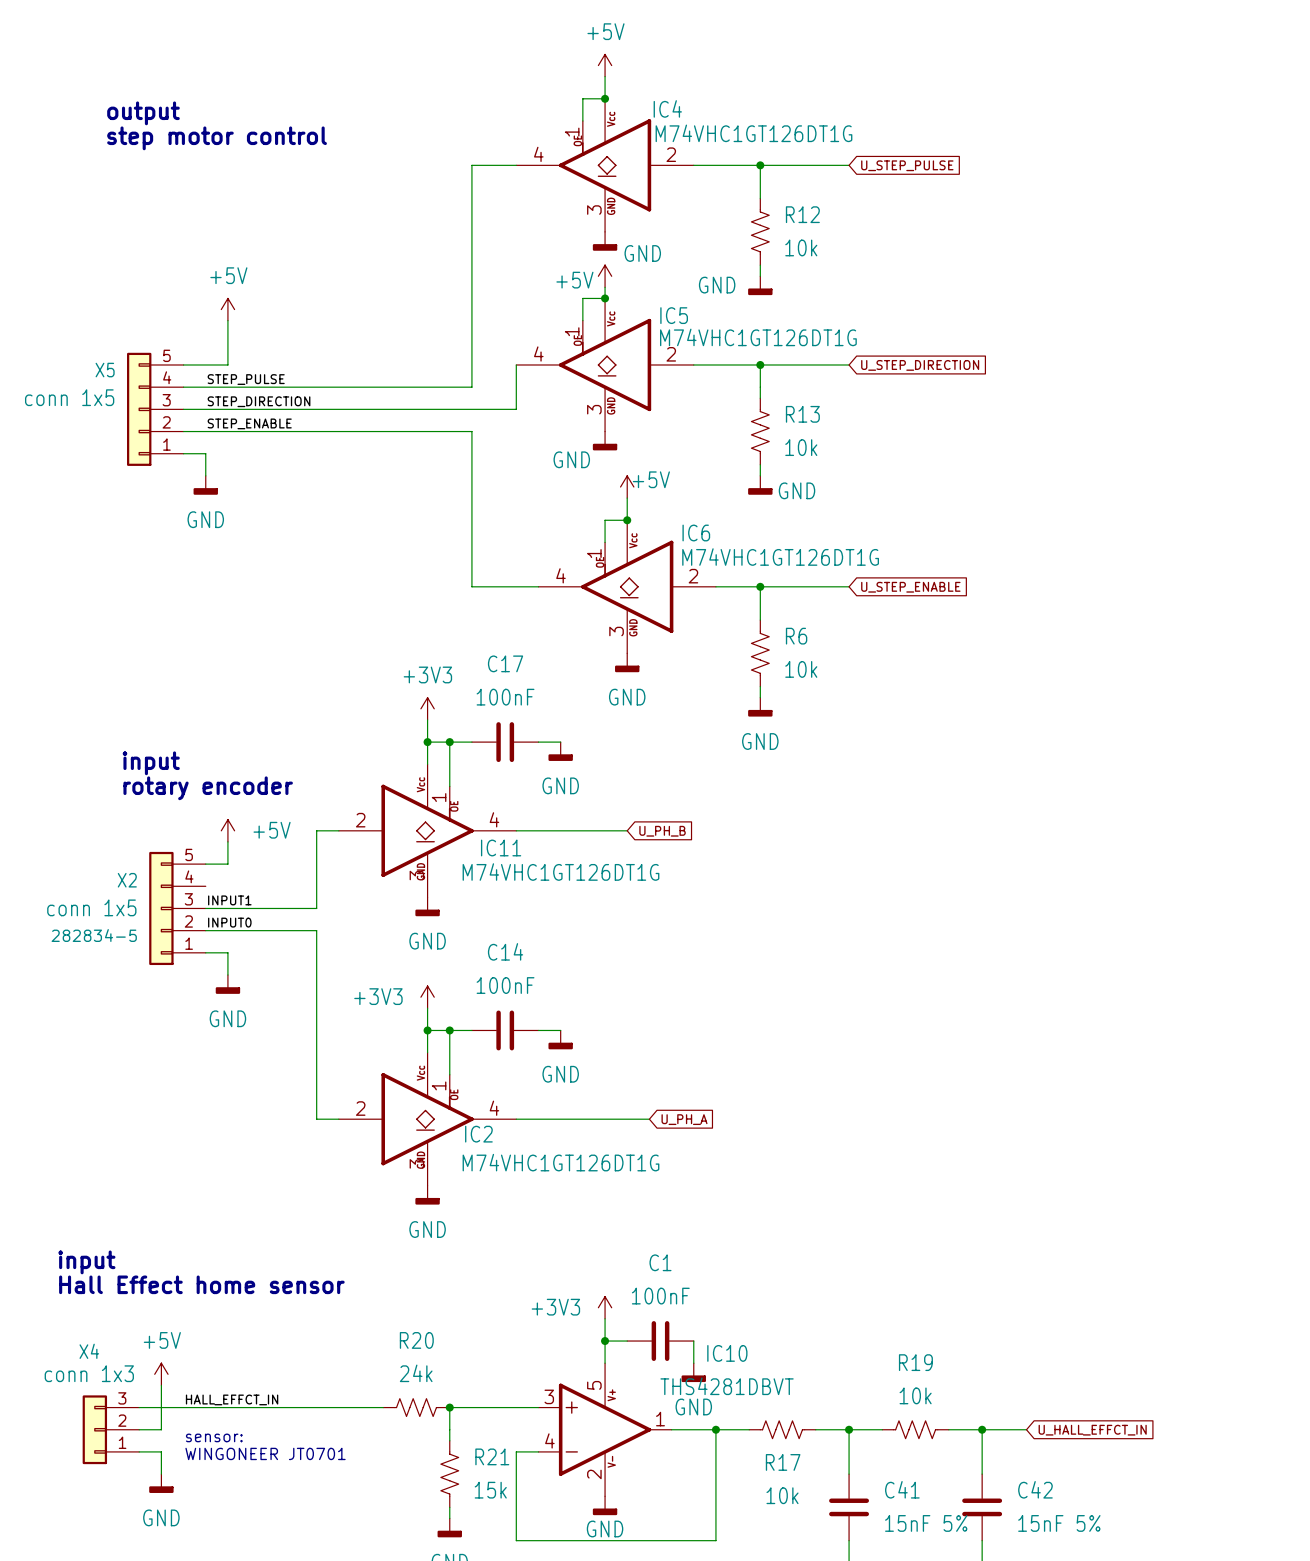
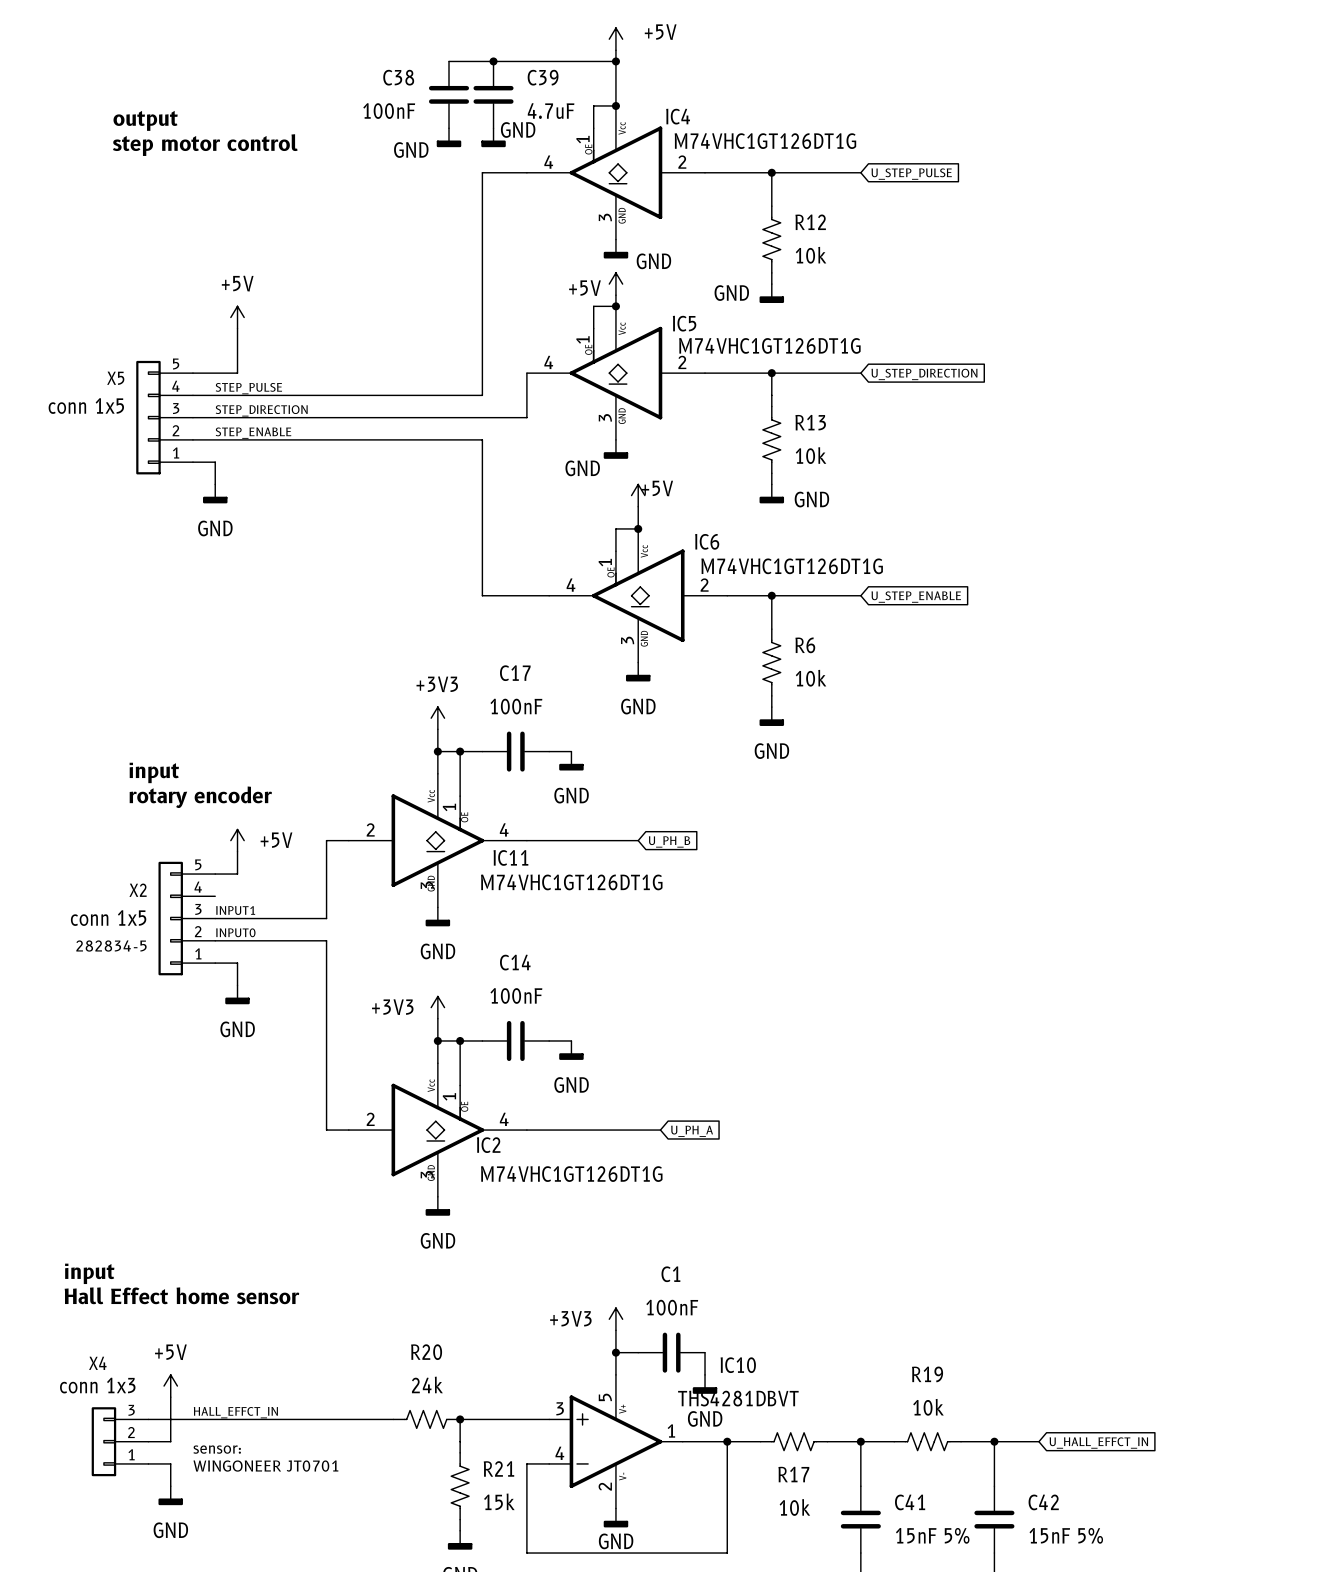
power symbol text position: +5V (605, 31) -> +5V (660, 32)
wire: none -> (449, 61) (615, 61)
junction: none -> (493, 61)
junction: none -> (615, 61)
power symbol position: +5V (605, 65) -> +5V (615, 39)
C38: none -> 100nF (449, 94)
C39: none -> 4.7uF (493, 94)
power symbol: none -> GND (449, 137)
power symbol: none -> GND (493, 137)

